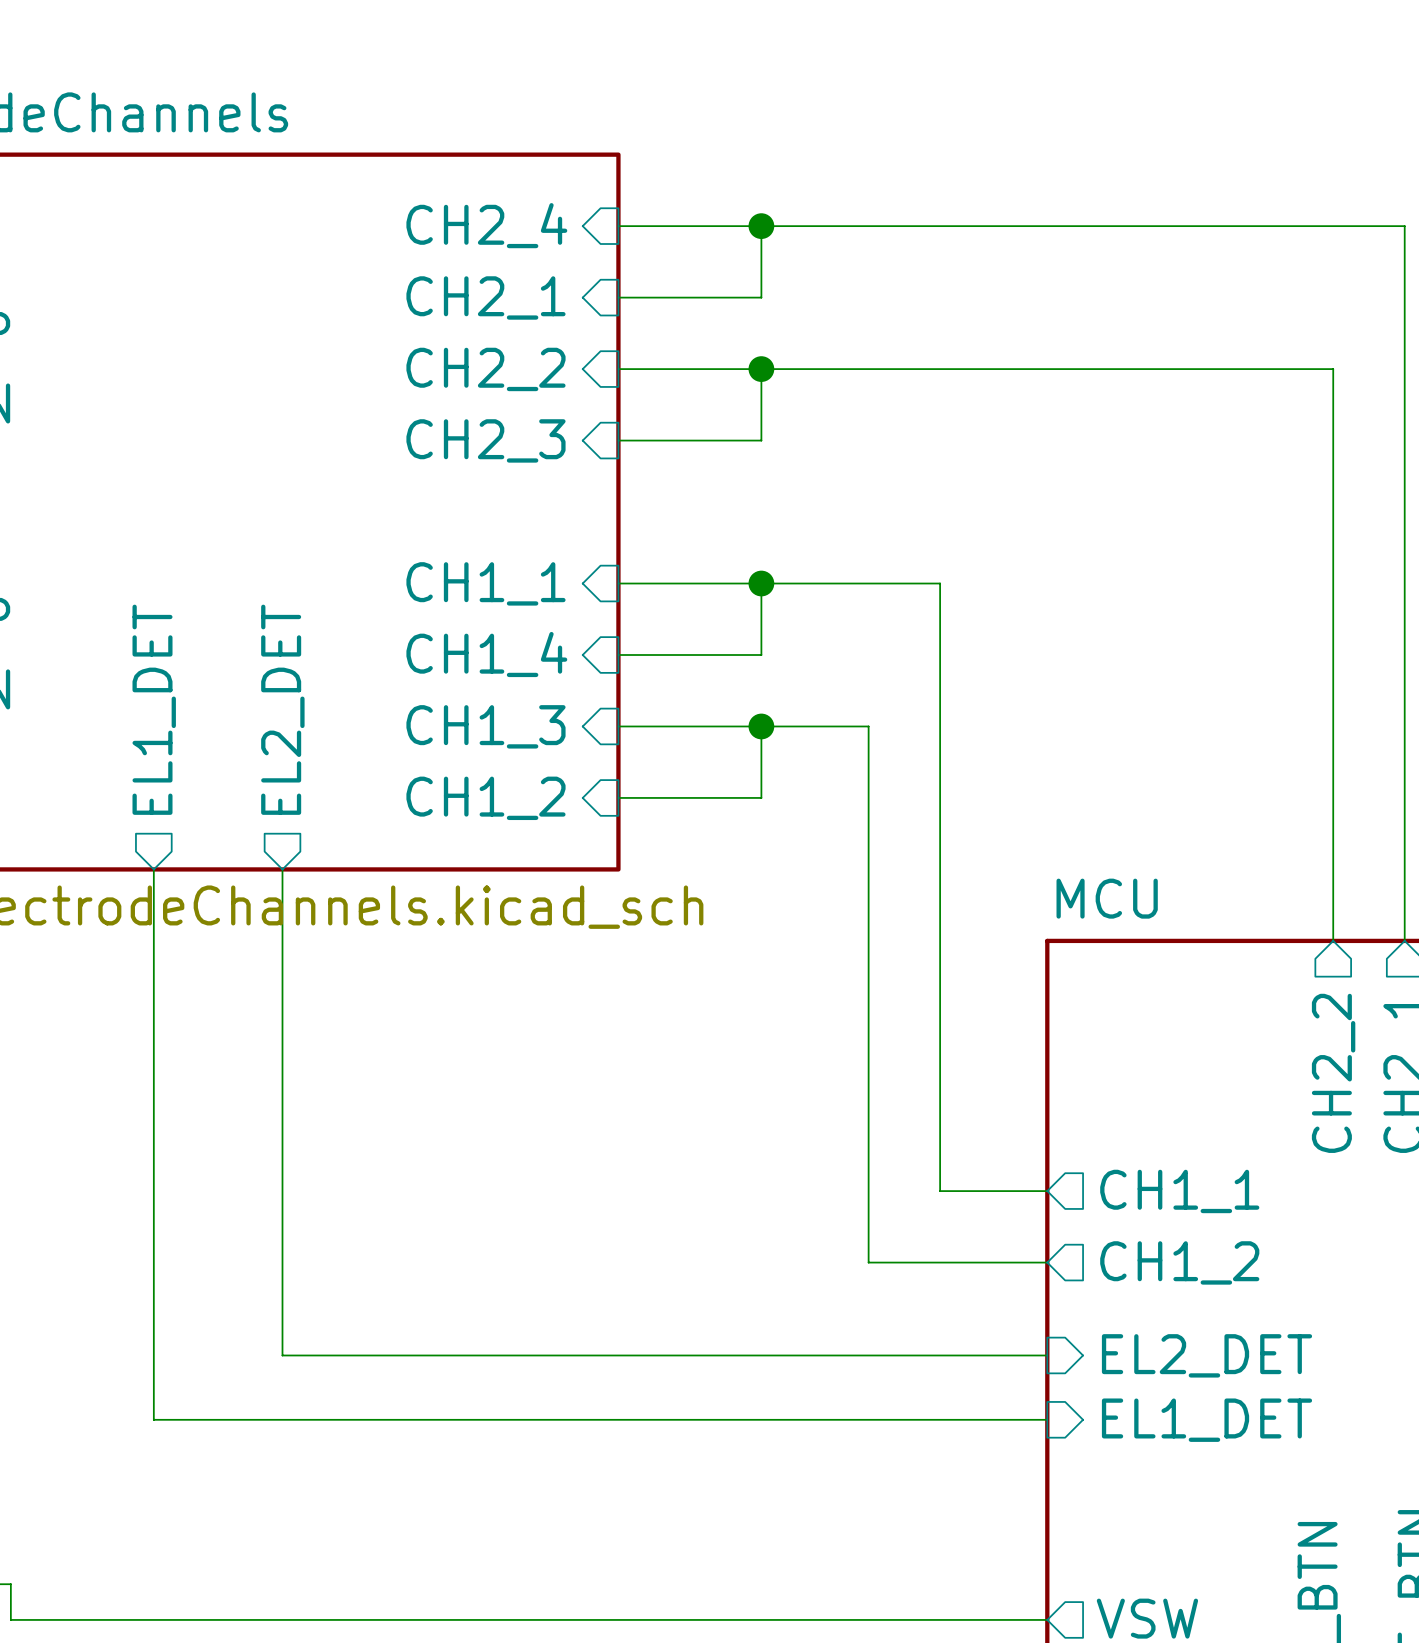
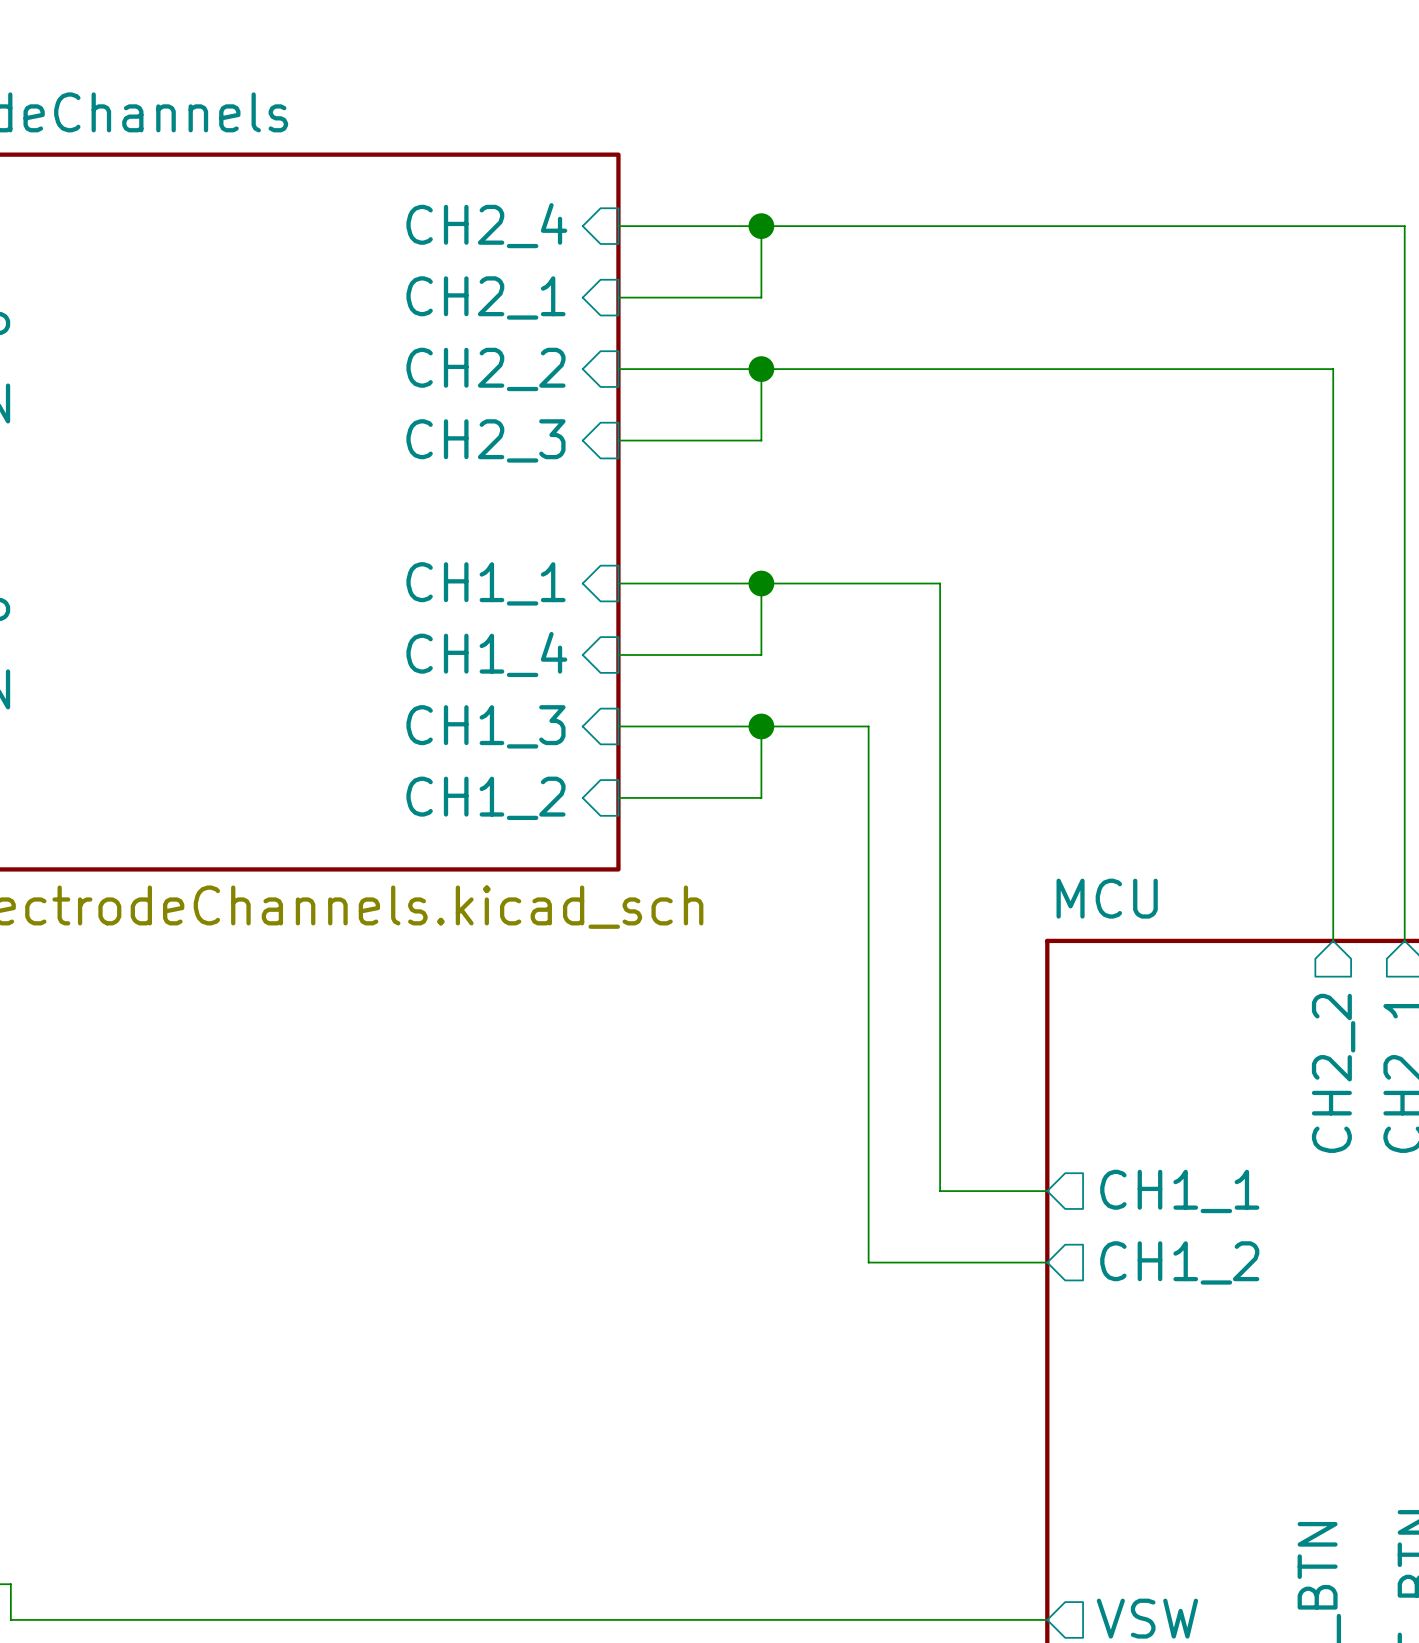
sheet pin: EL1_DET (154, 709) -> none
sheet pin: EL2_DET (282, 709) -> none
wire: (153, 869) (153, 1419) (1047, 1419) -> none
wire: (282, 869) (282, 1355) (1047, 1355) -> none
sheet pin: EL2_DET (1206, 1355) -> none
sheet pin: EL1_DET (1206, 1420) -> none

